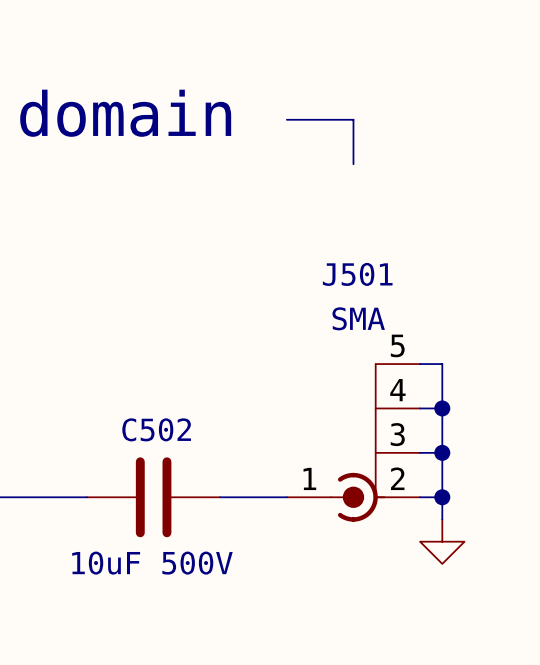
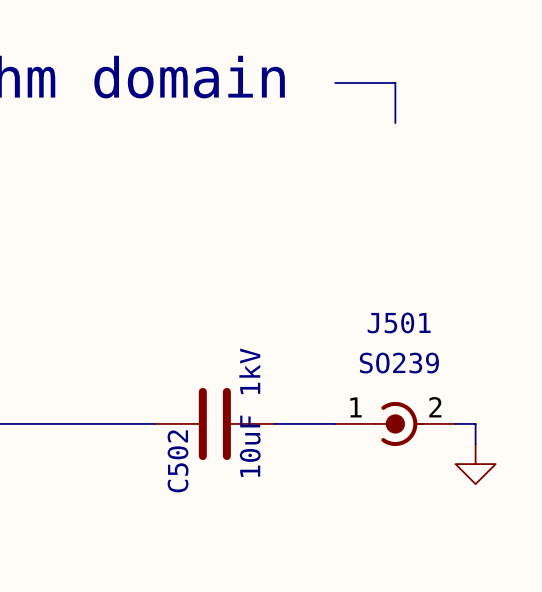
J501 name position: J501 (357, 274) -> J501 (399, 322)
J501 value: SMA (358, 318) -> SO239 (399, 363)
J501 symbol: [286, 364, 421, 522] -> [335, 401, 456, 447]
wire: (420, 364) (442, 364) (442, 497) -> none
wire: (420, 408) (442, 408) -> none
junction: (442, 408) -> none
C502 name rotation: 0° (156, 429) -> 90° counterclockwise (178, 461)
C502 name position: C502 (156, 429) -> C502 (178, 461)
wire: (420, 452) (442, 452) -> none
junction: (442, 452) -> none
junction: (442, 497) -> none
C502 value: 10uF 500V (152, 563) -> 10uF 1kV (249, 412)

